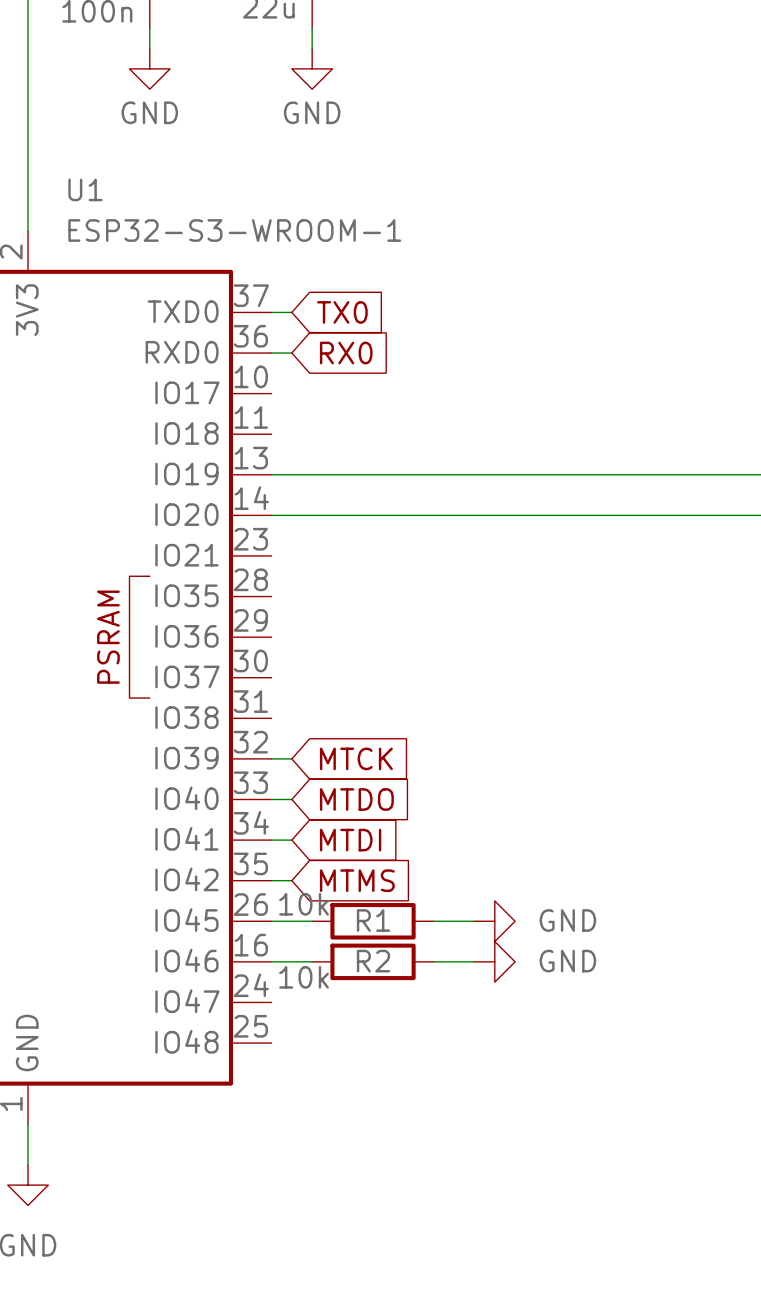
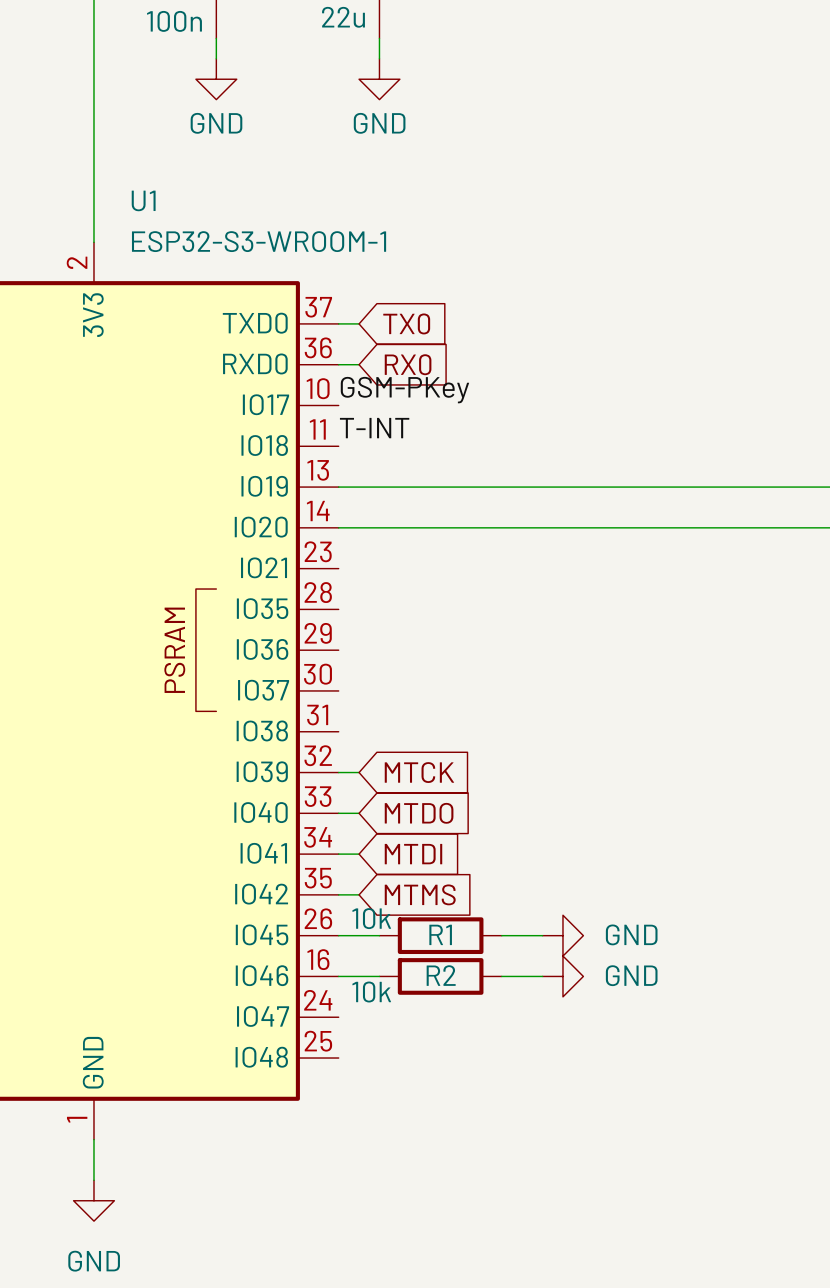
label: none -> GSM-PKey (404, 390)
label: none -> T-INT (374, 428)

